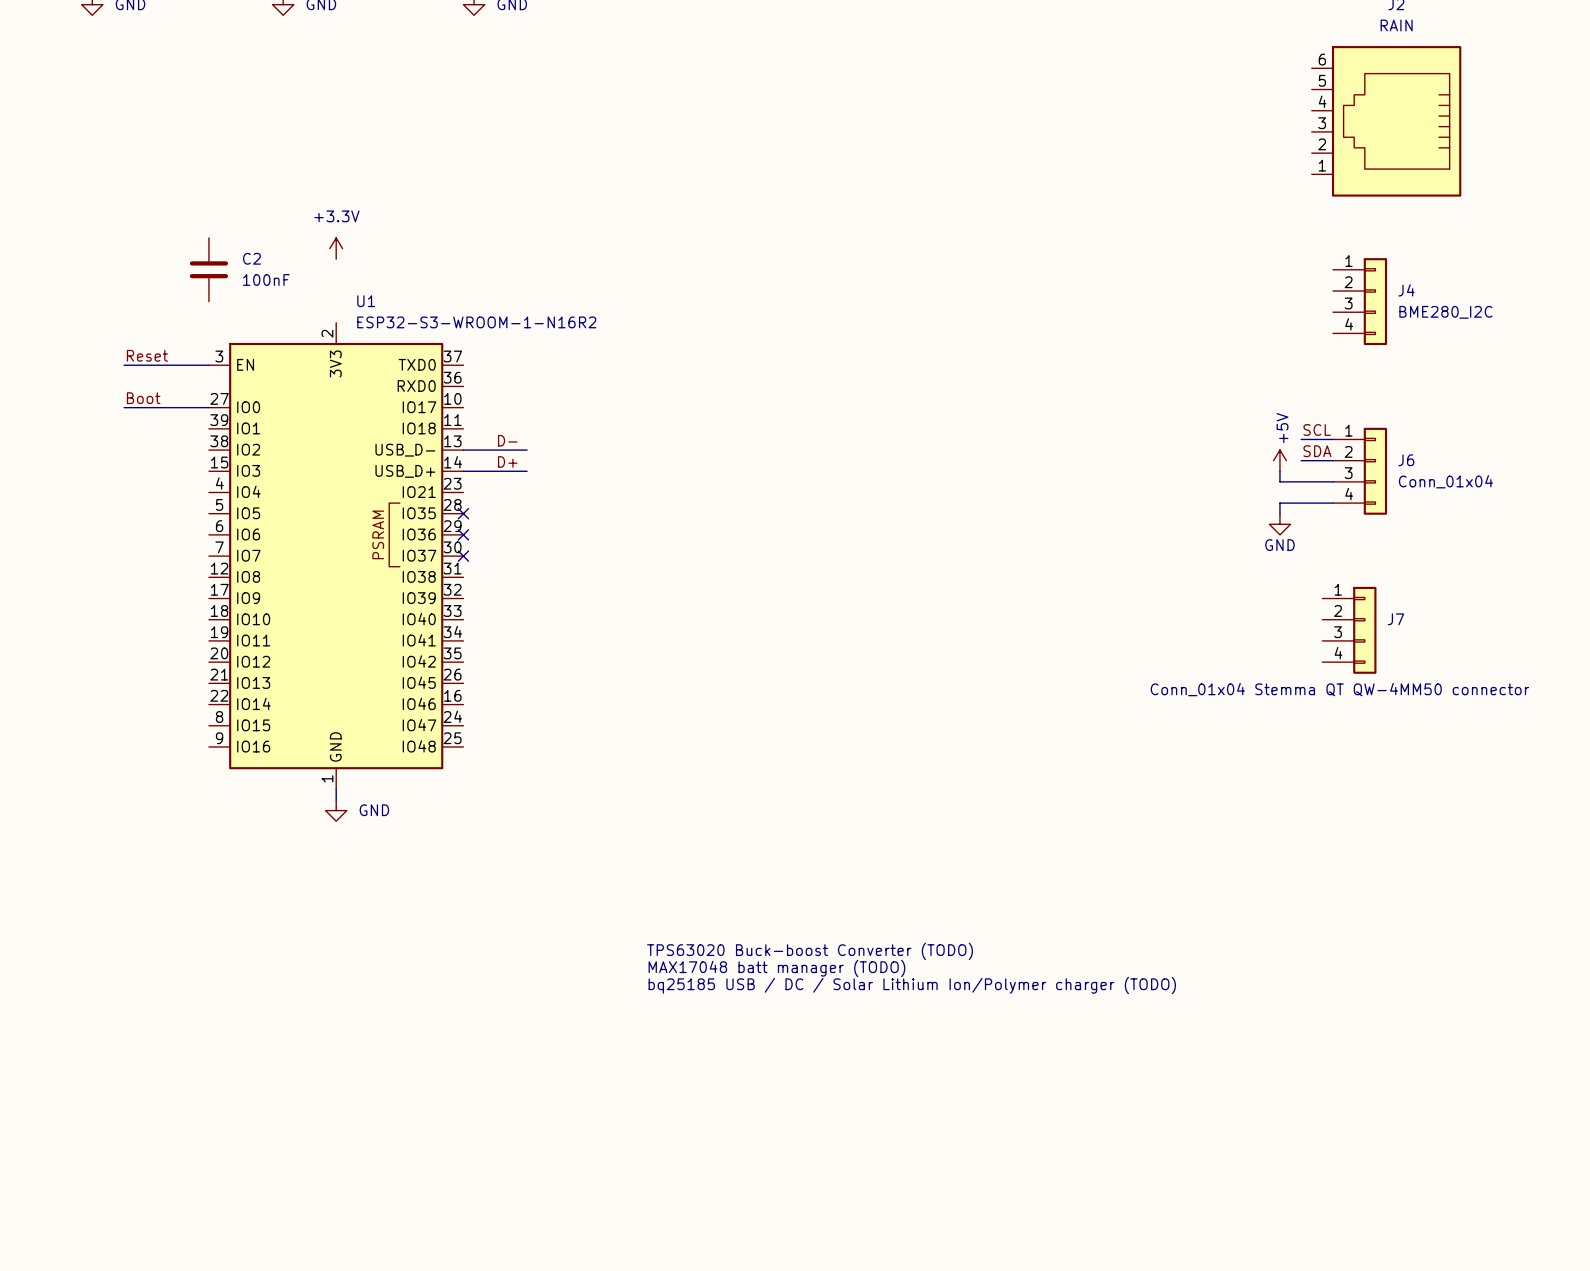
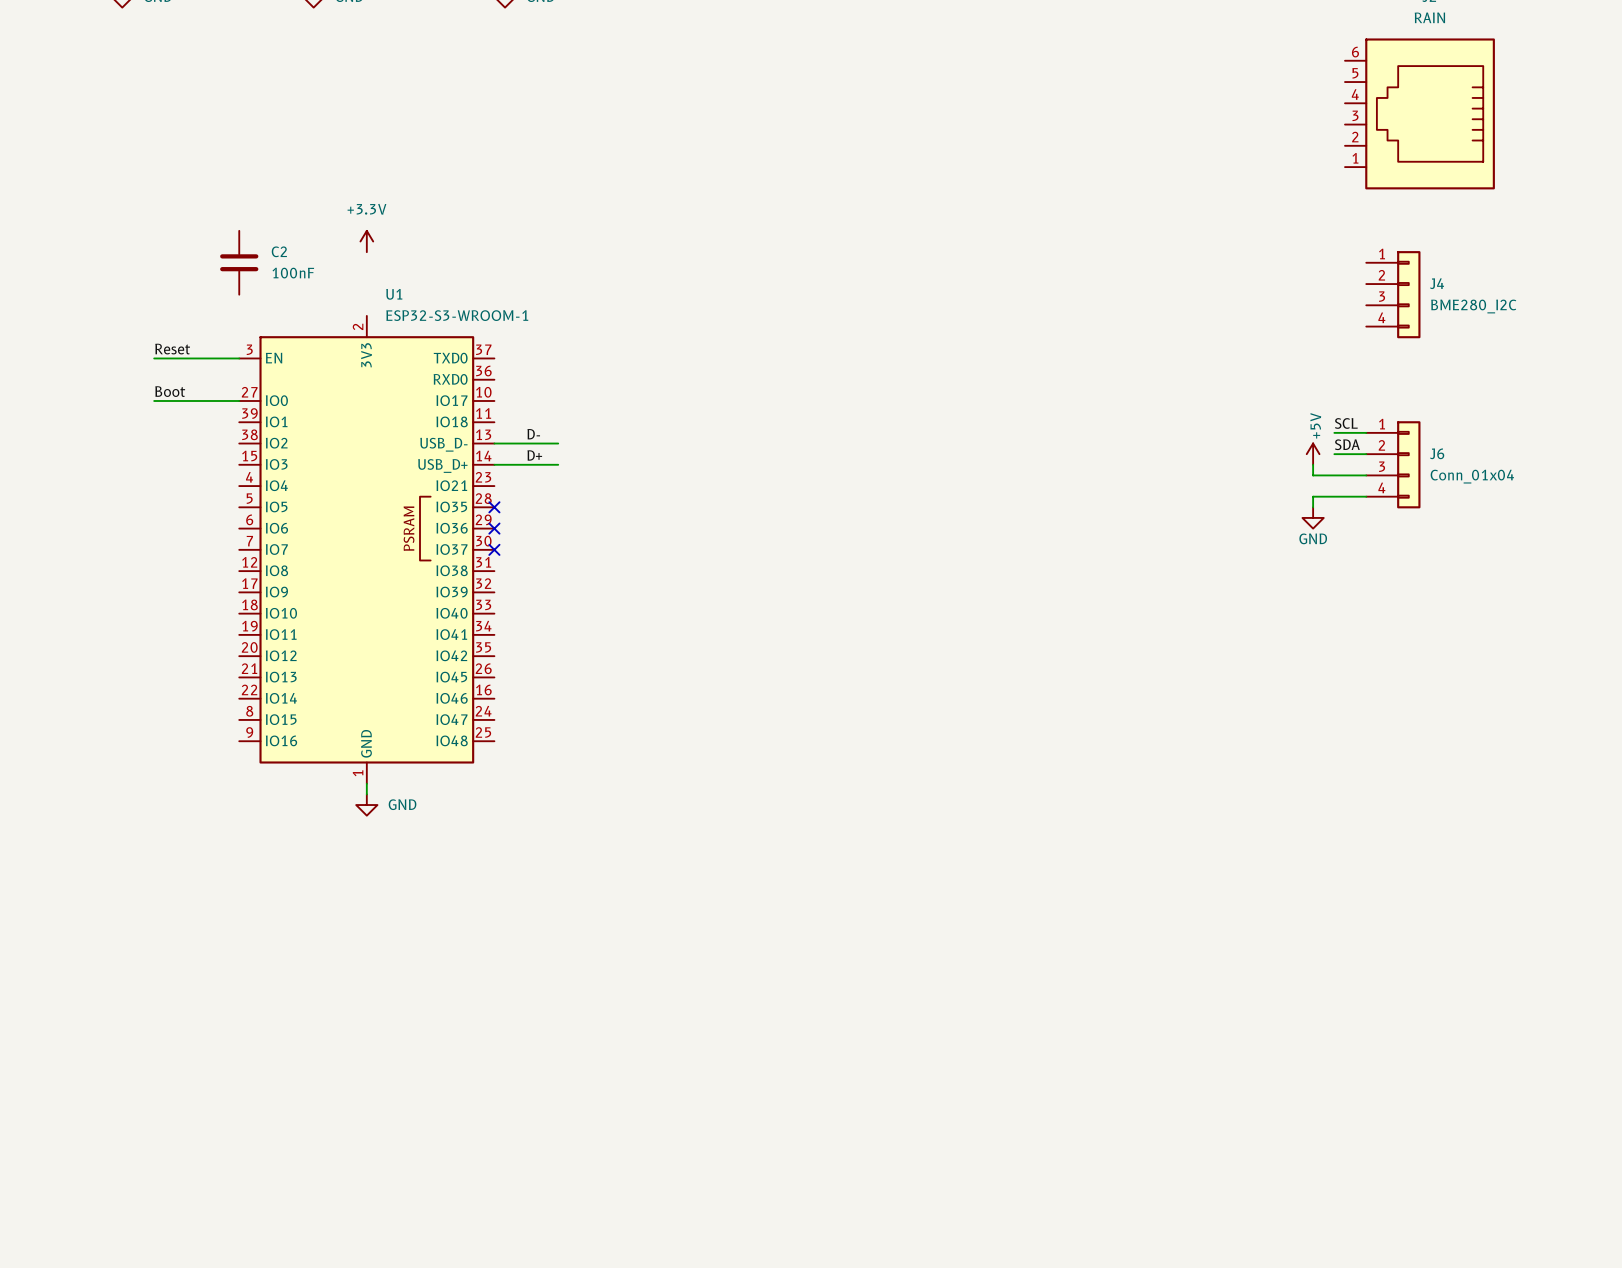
U1 value: ESP32-S3-WROOM-1-N16R2 (476, 322) -> ESP32-S3-WROOM-1 (457, 315)
J7: Conn_01x04 Stemma QT QW-4MM50 connector (1349, 630) -> none
text: TPS63020 Buck-boost Converter (TODO) (810, 951) -> none
text: MAX17048 batt manager (TODO) (776, 968) -> none
text: bq25185 USB / DC / Solar Lithium Ion/Polymer charger (TODO) (912, 985) -> none

